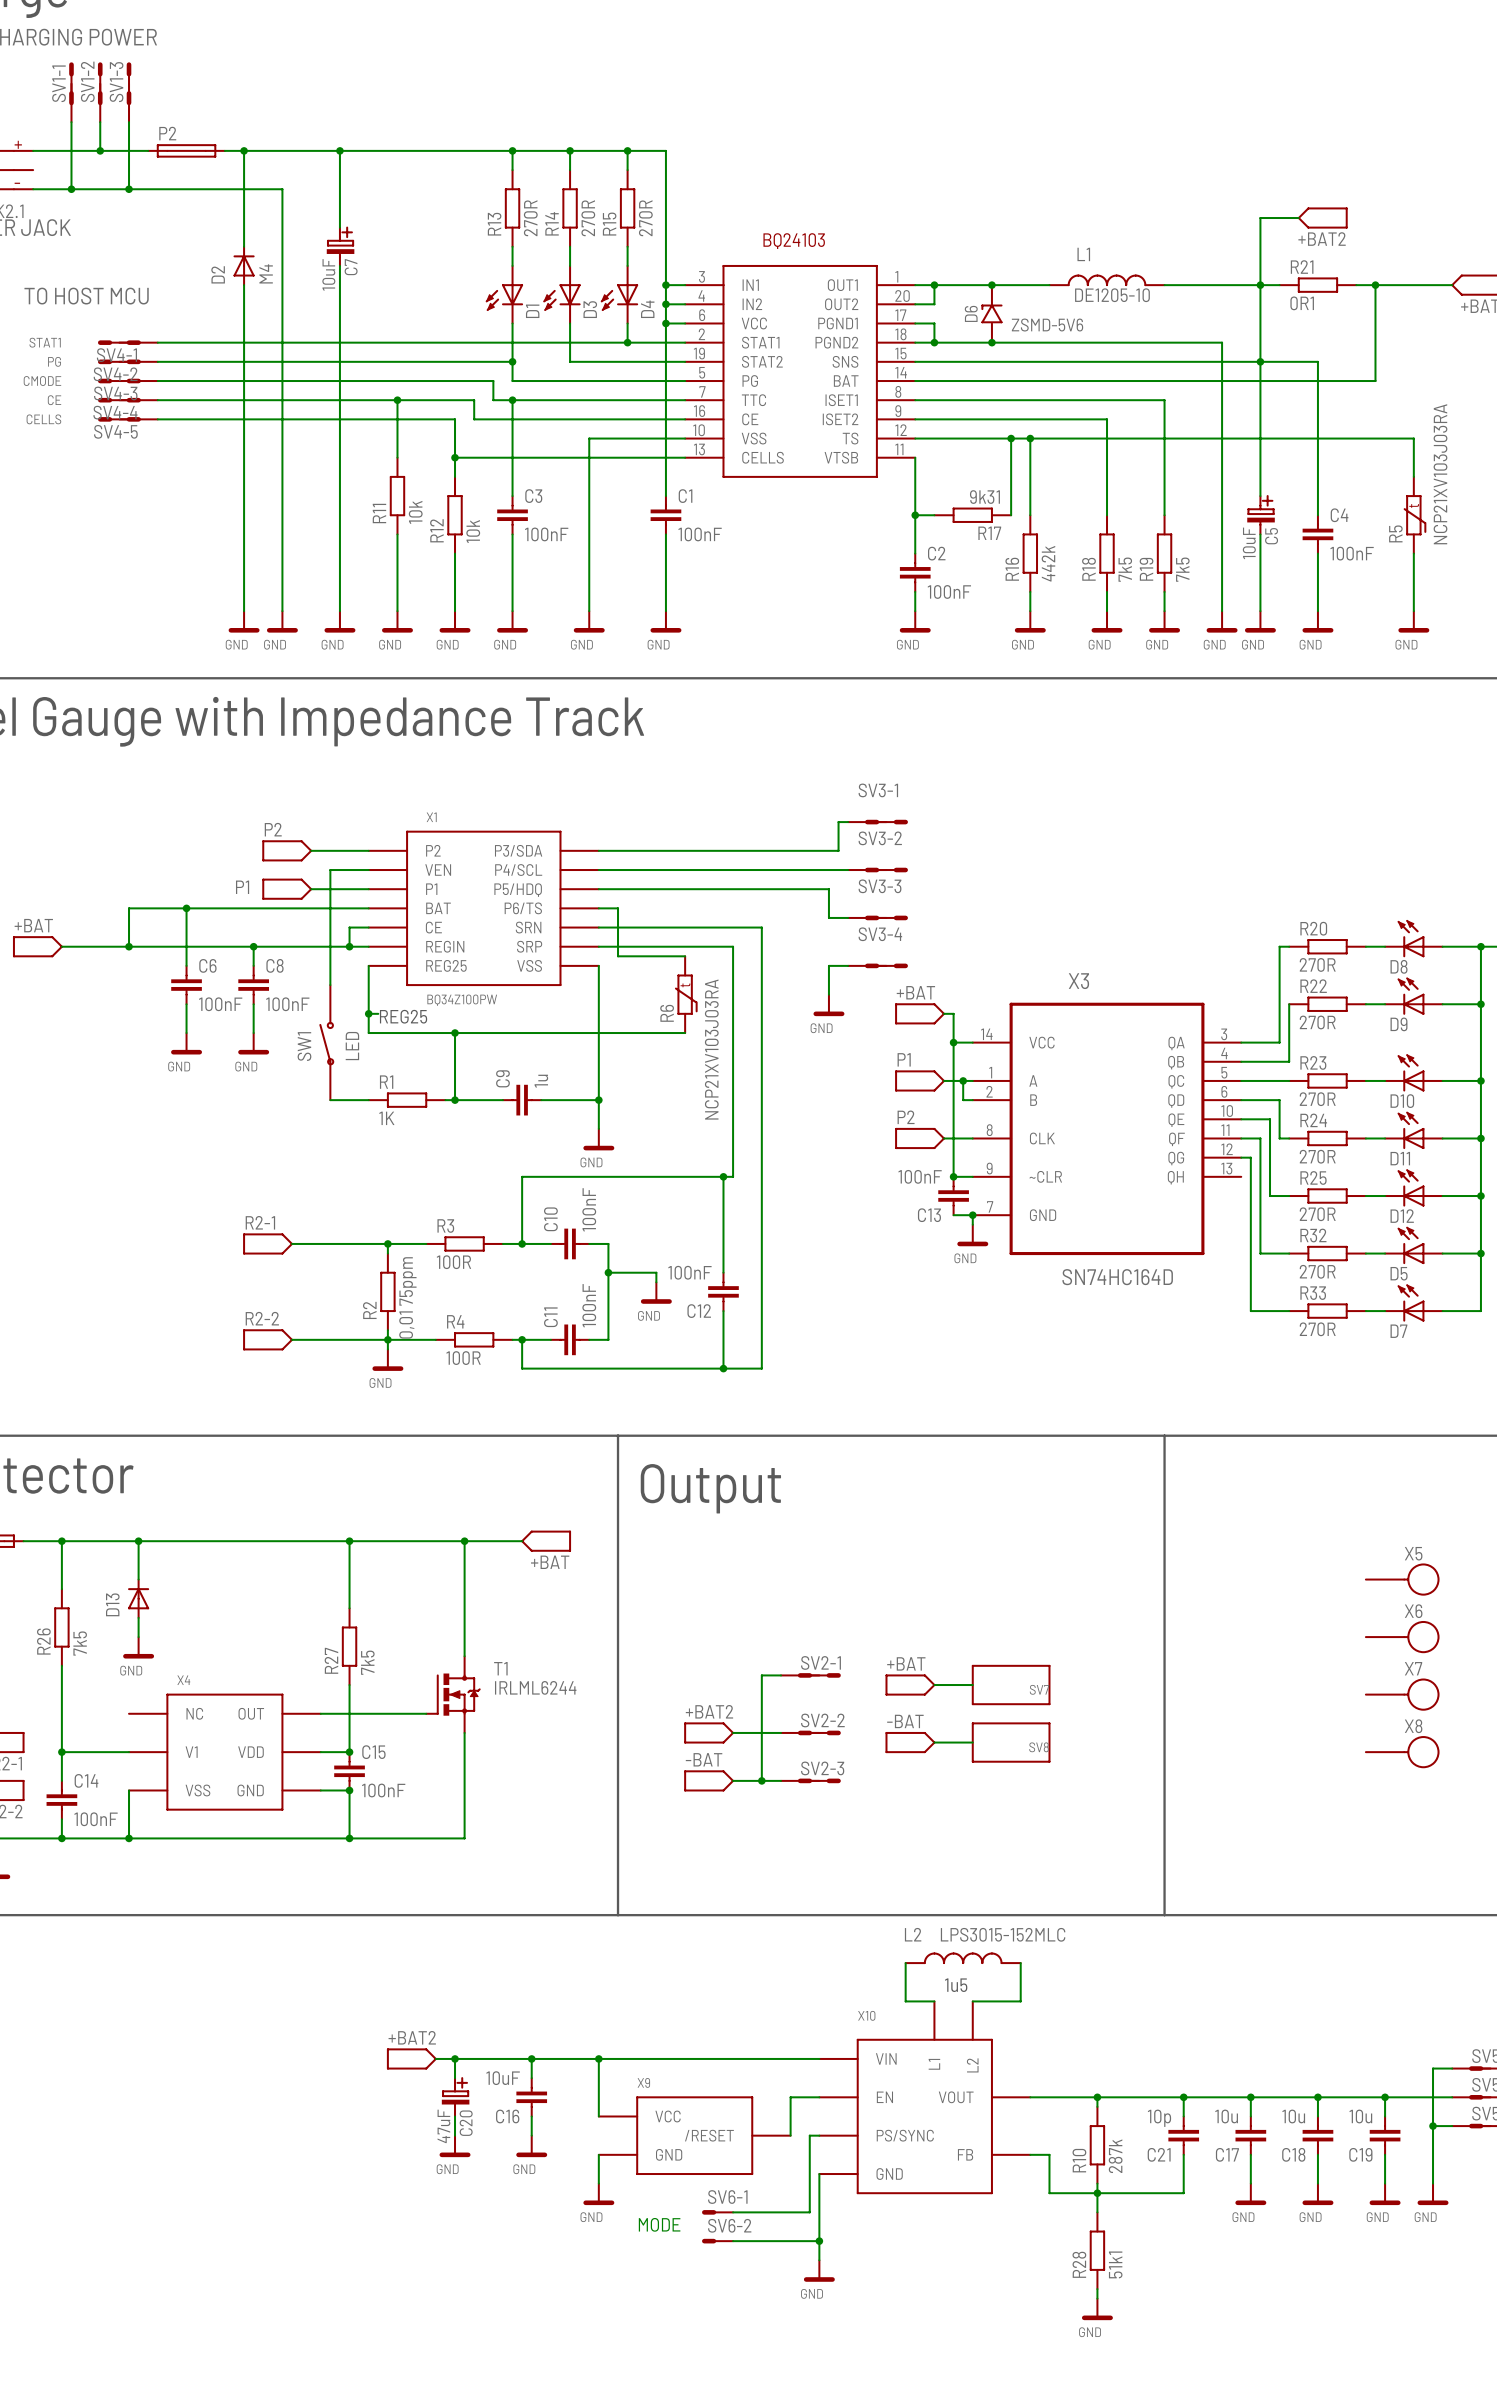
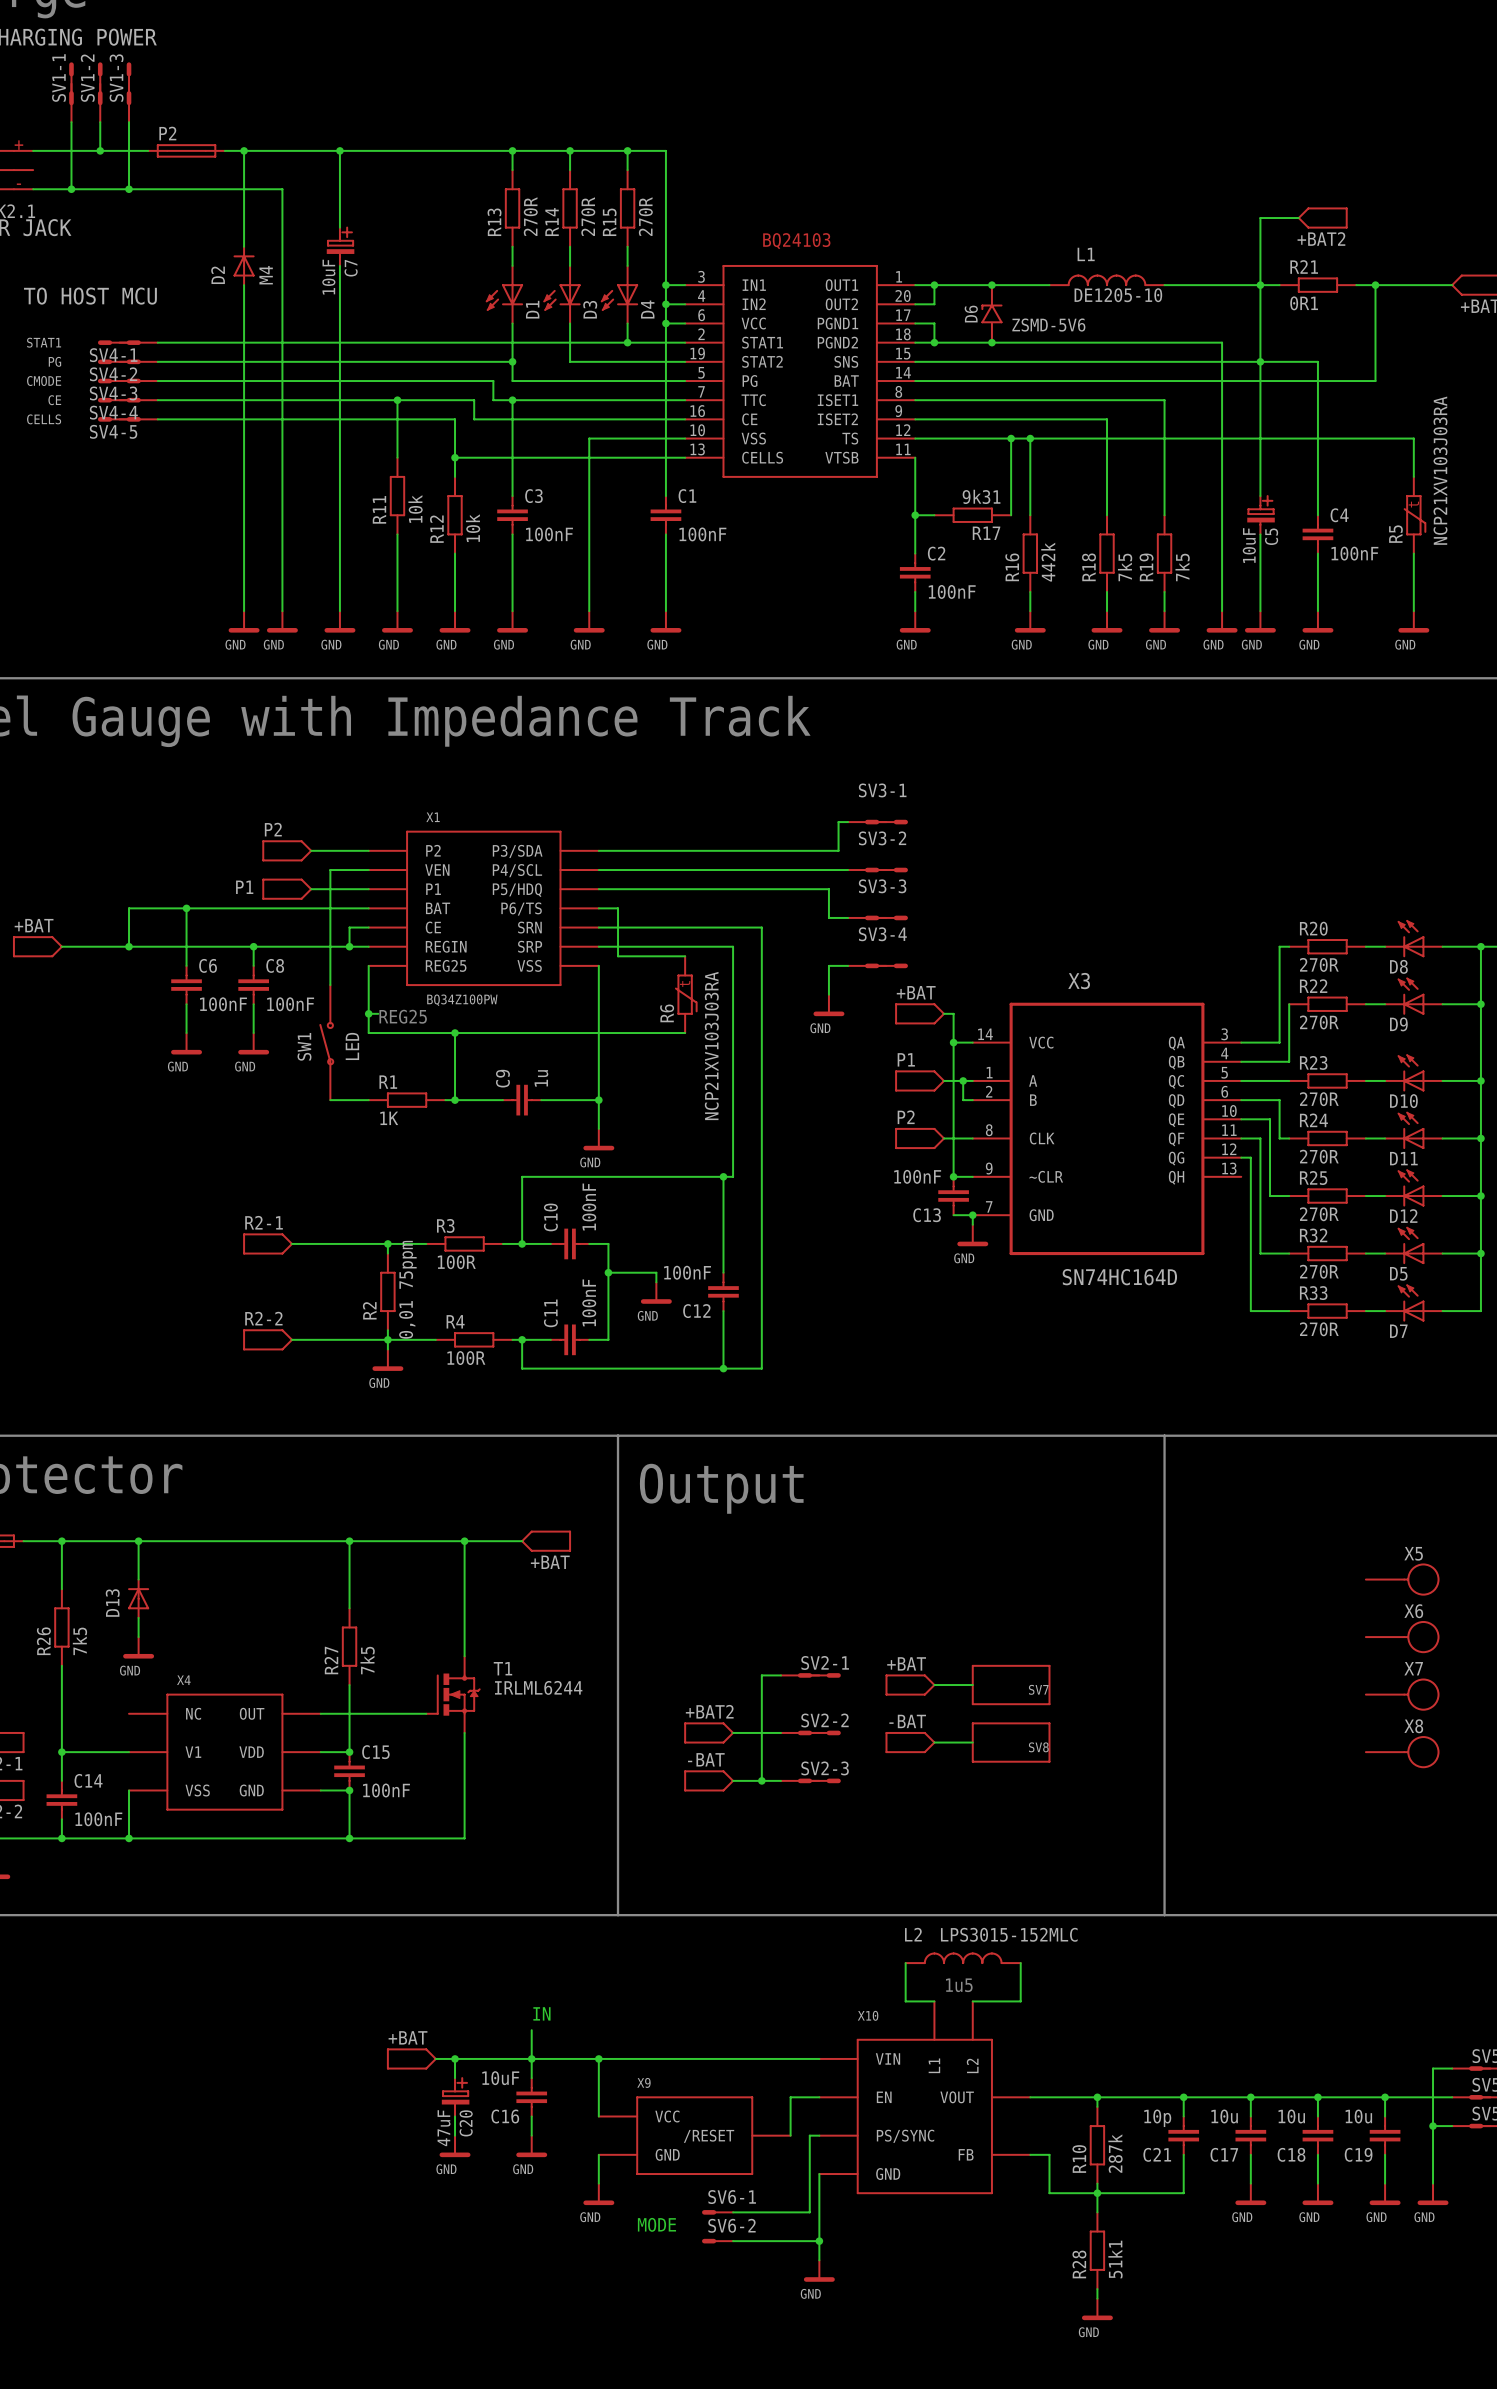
text: none -> IN (541, 2013)
wire: none -> (531, 2030) (531, 2058)
part value: +BAT2 (412, 2037) -> +BAT (408, 2037)

